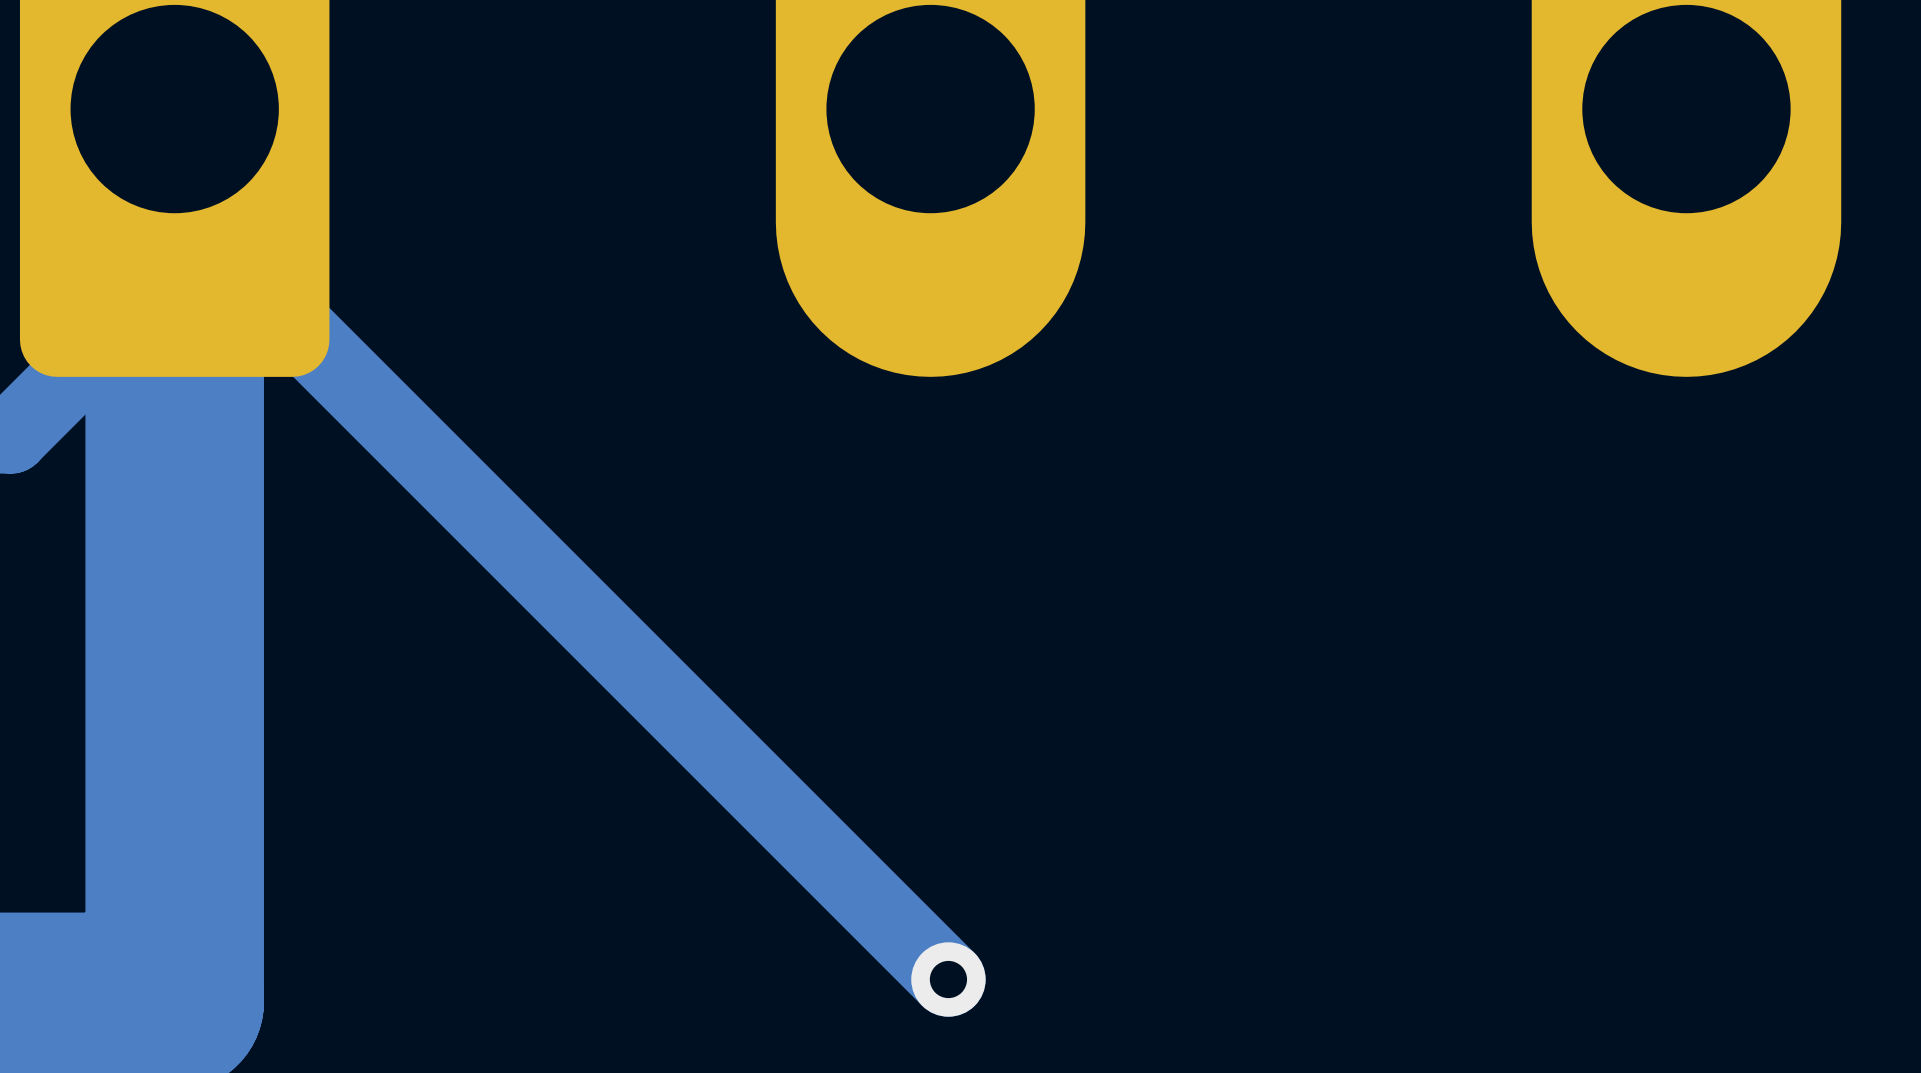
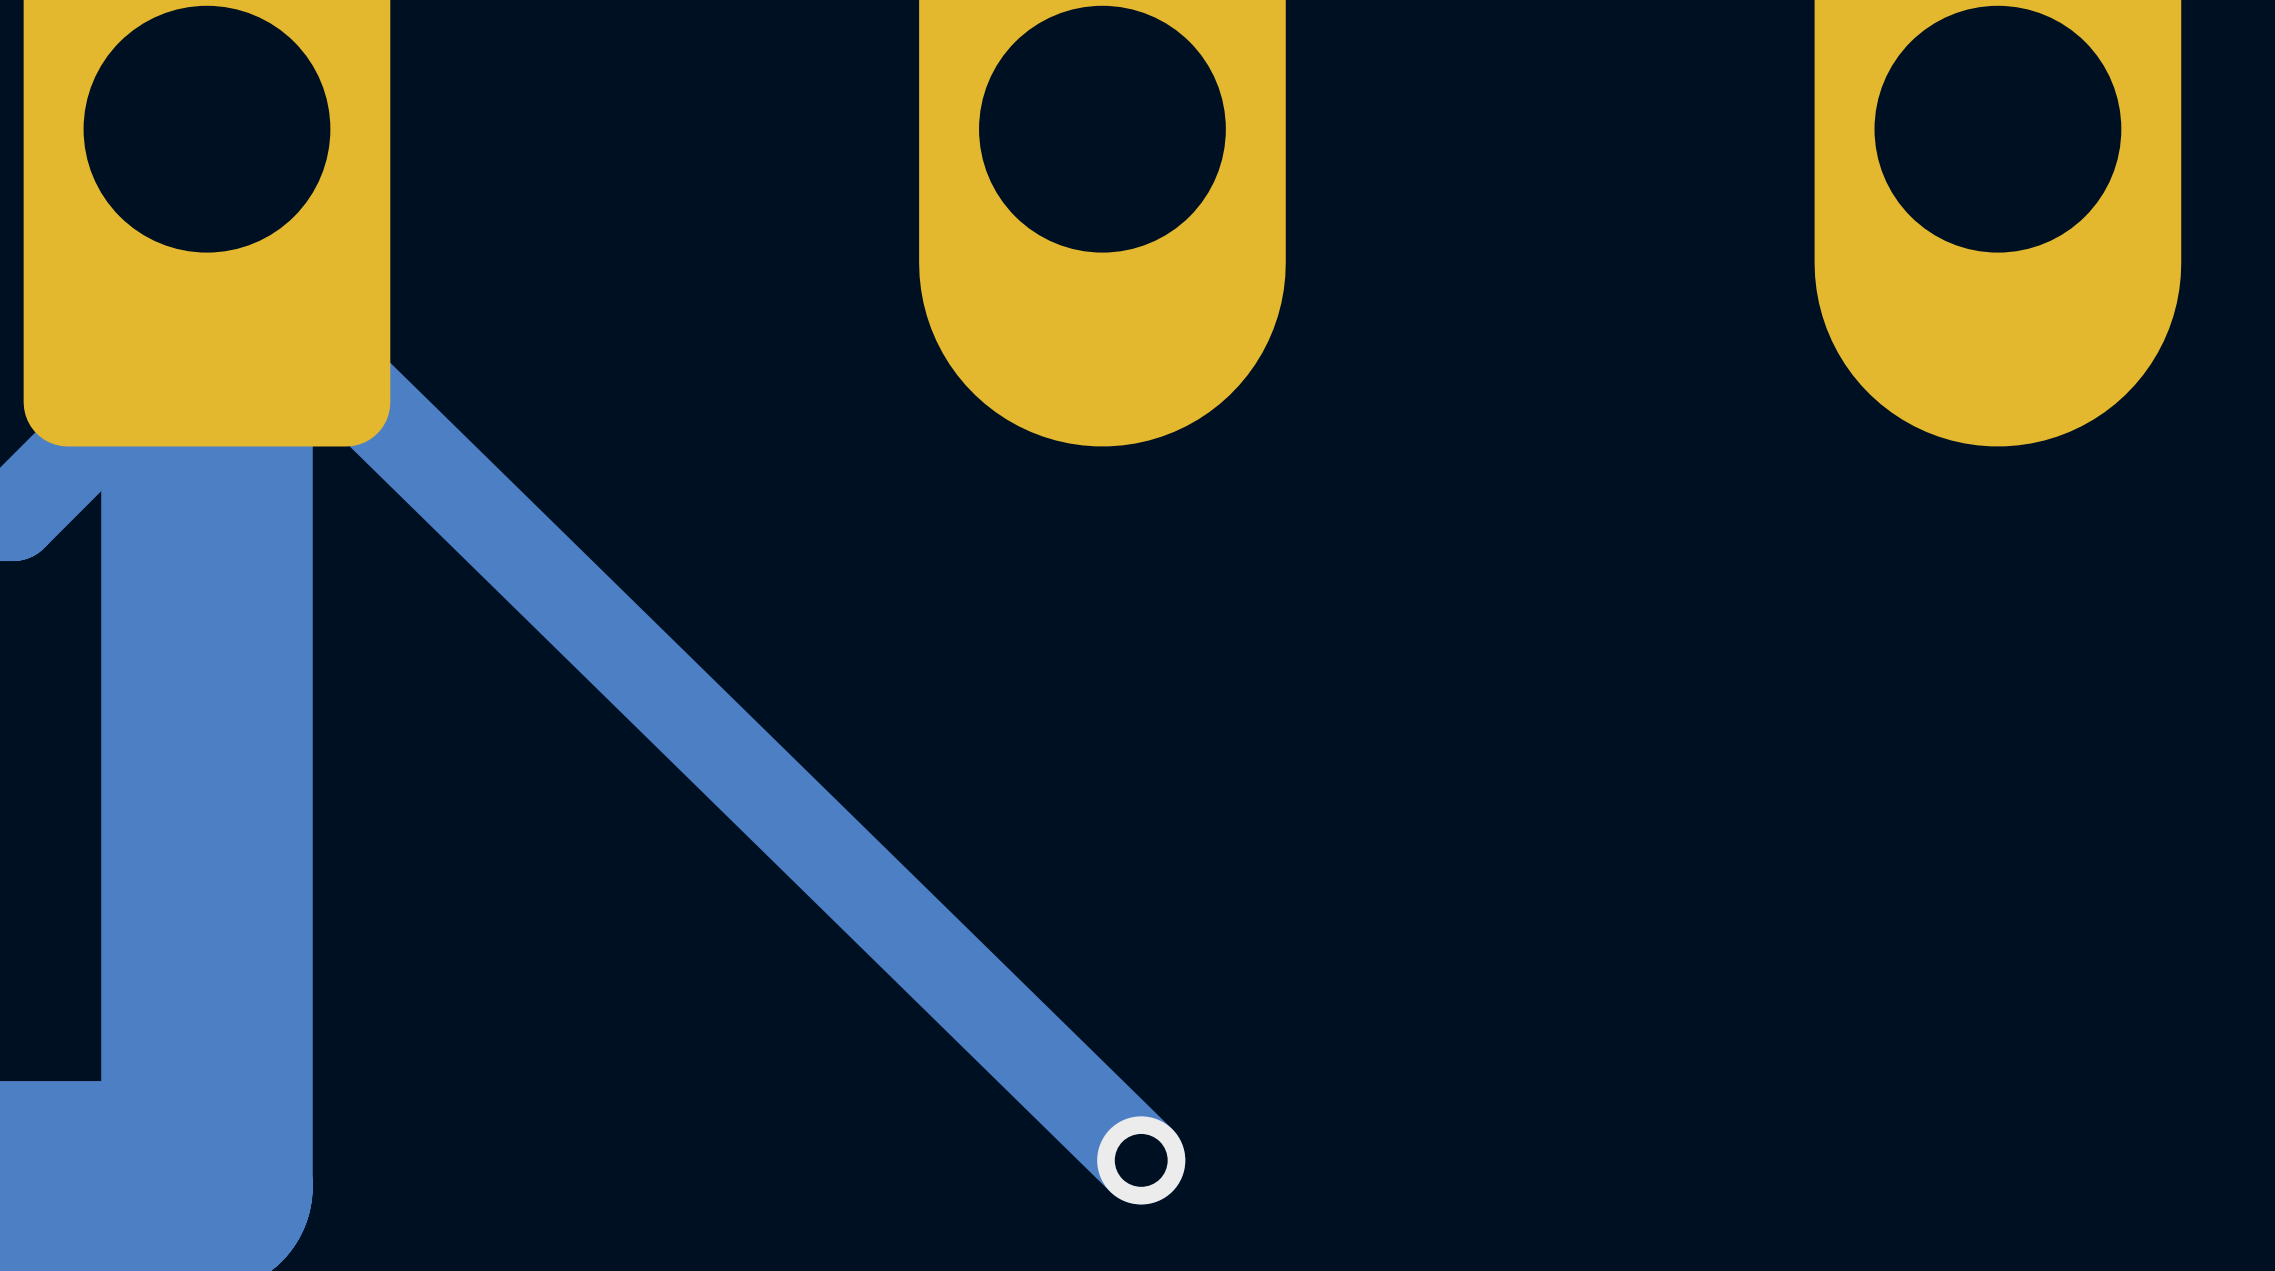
track: (219, 250) (948, 979) -> (259, 296) (1141, 1160)
via position: (948, 979) -> (1141, 1160)

